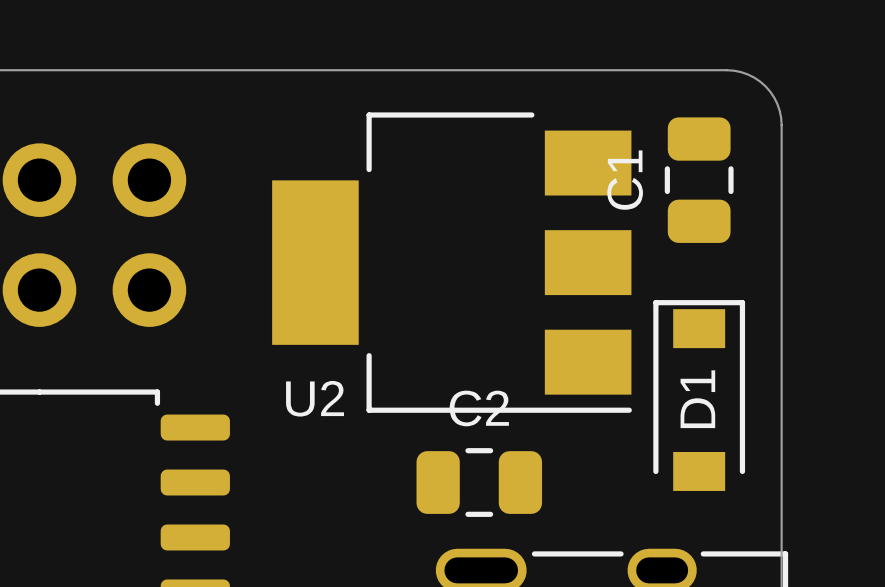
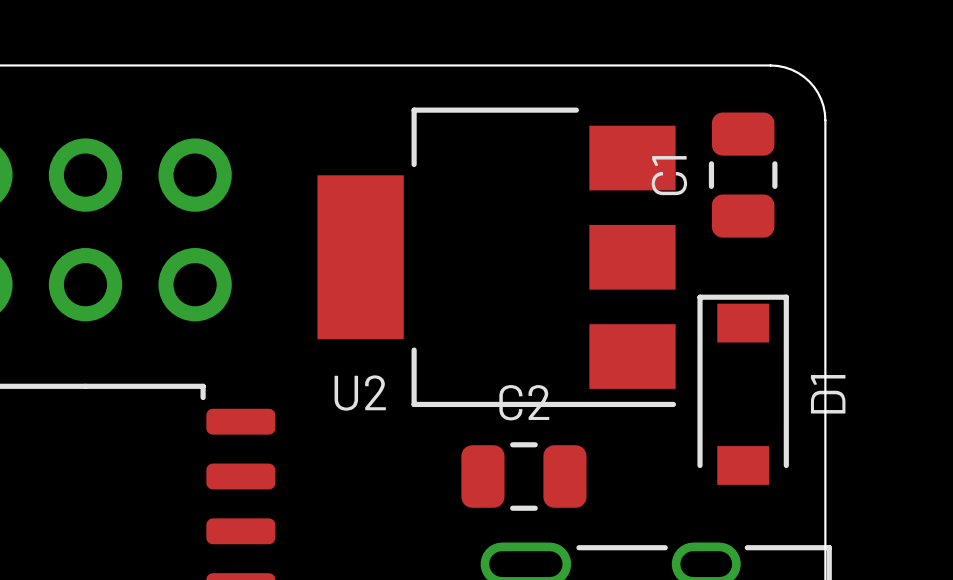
D1 name position: D1 (697, 399) -> D1 (828, 394)

